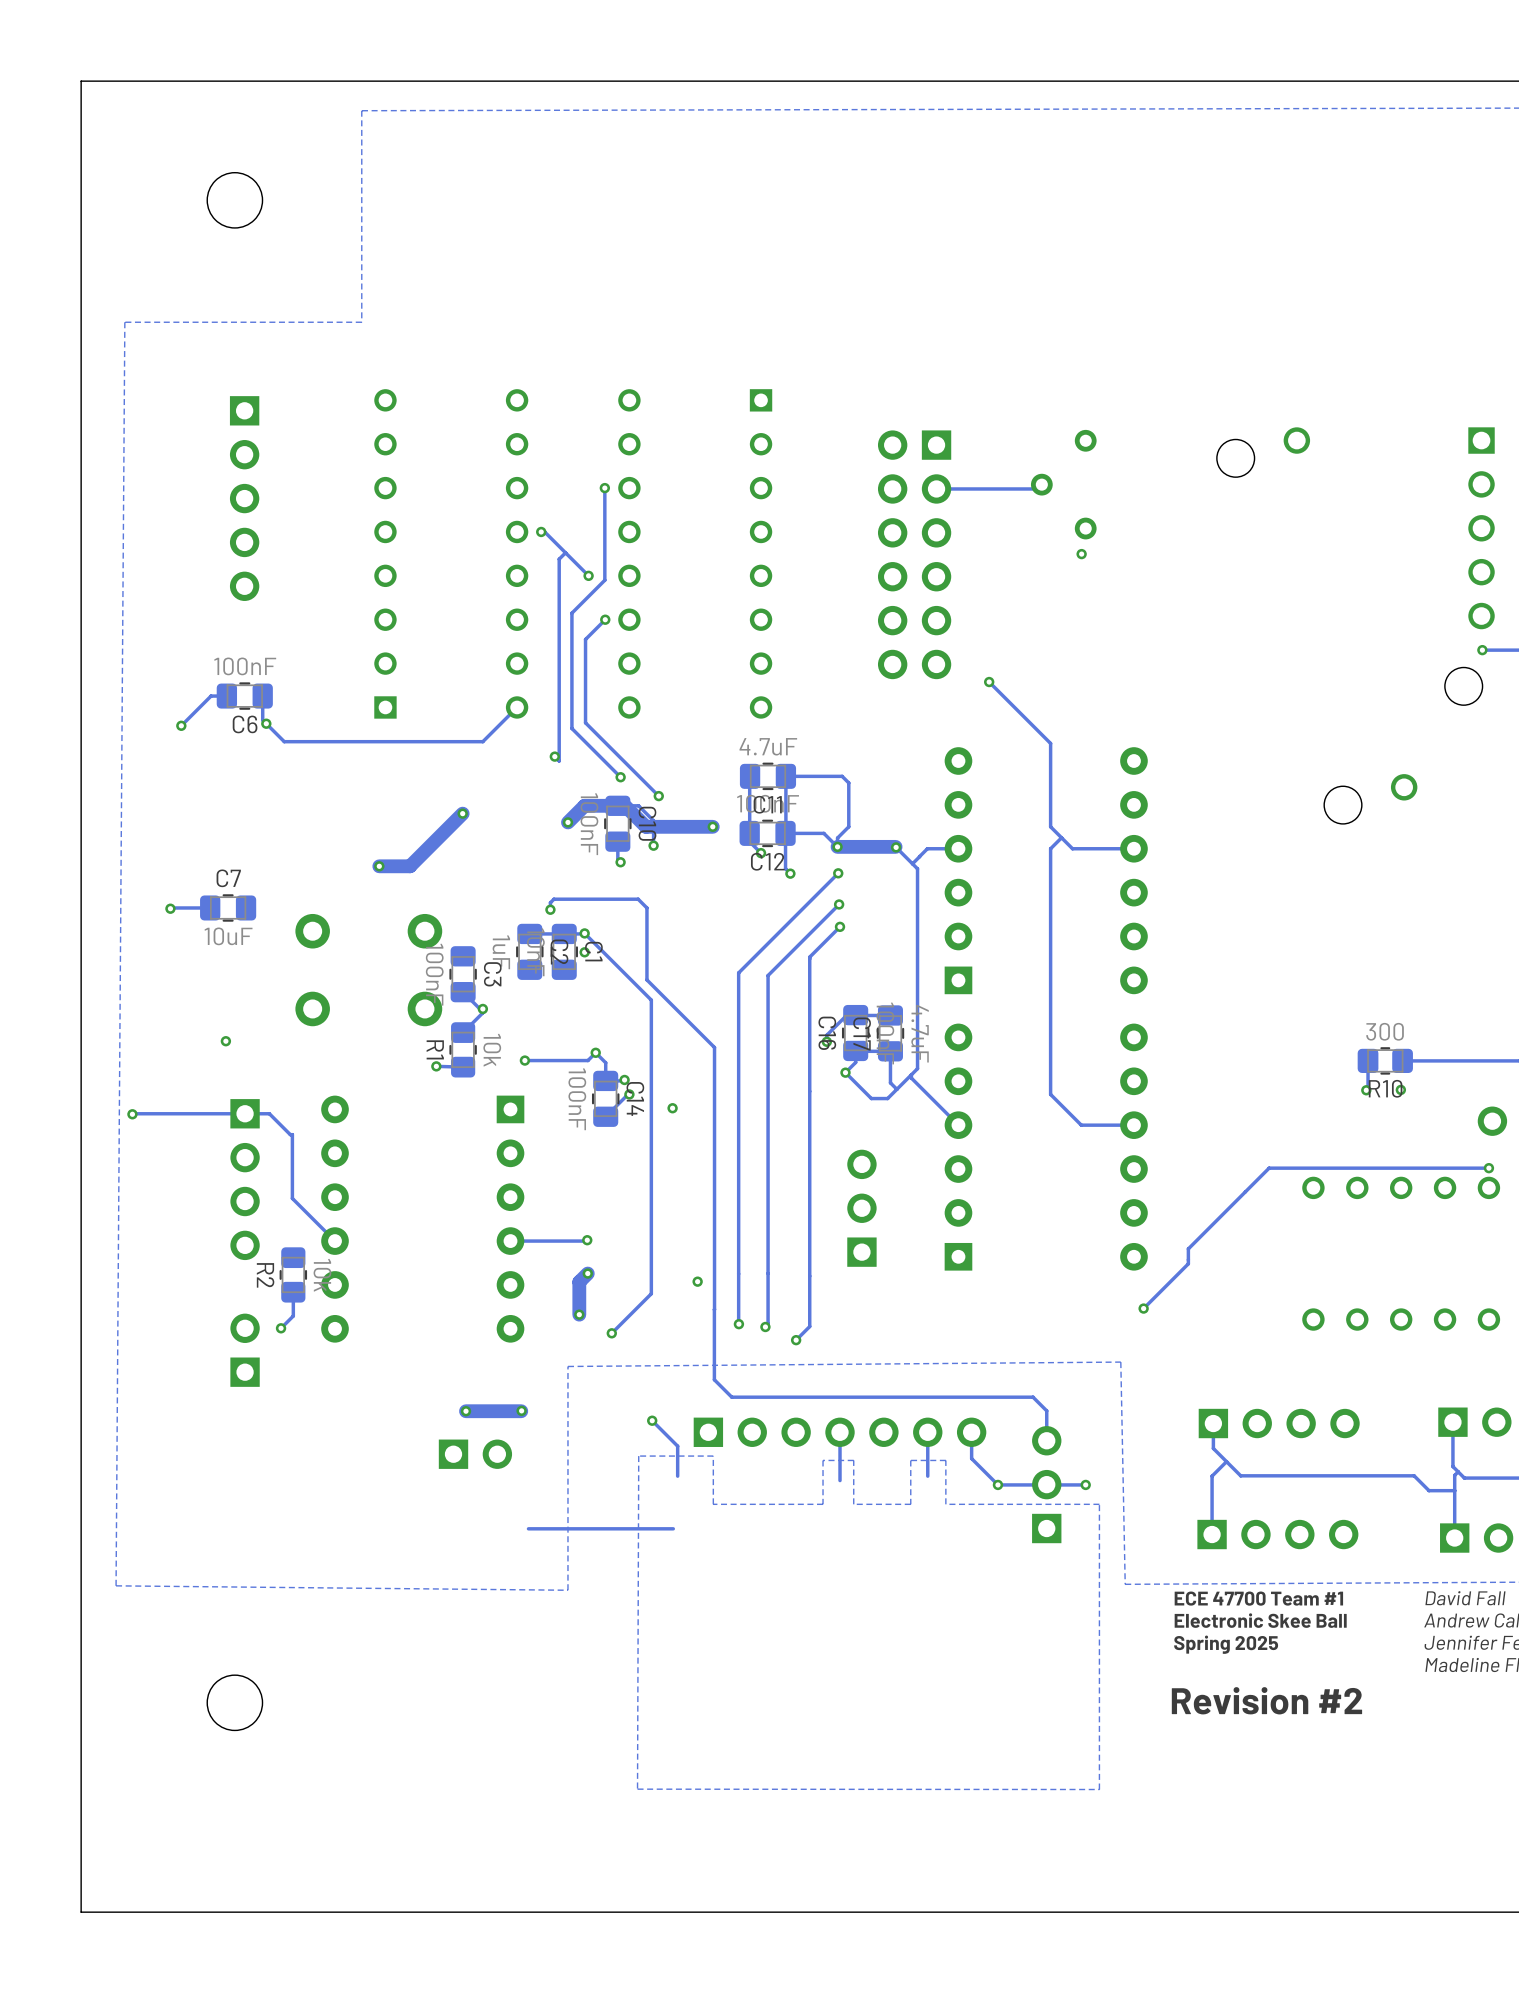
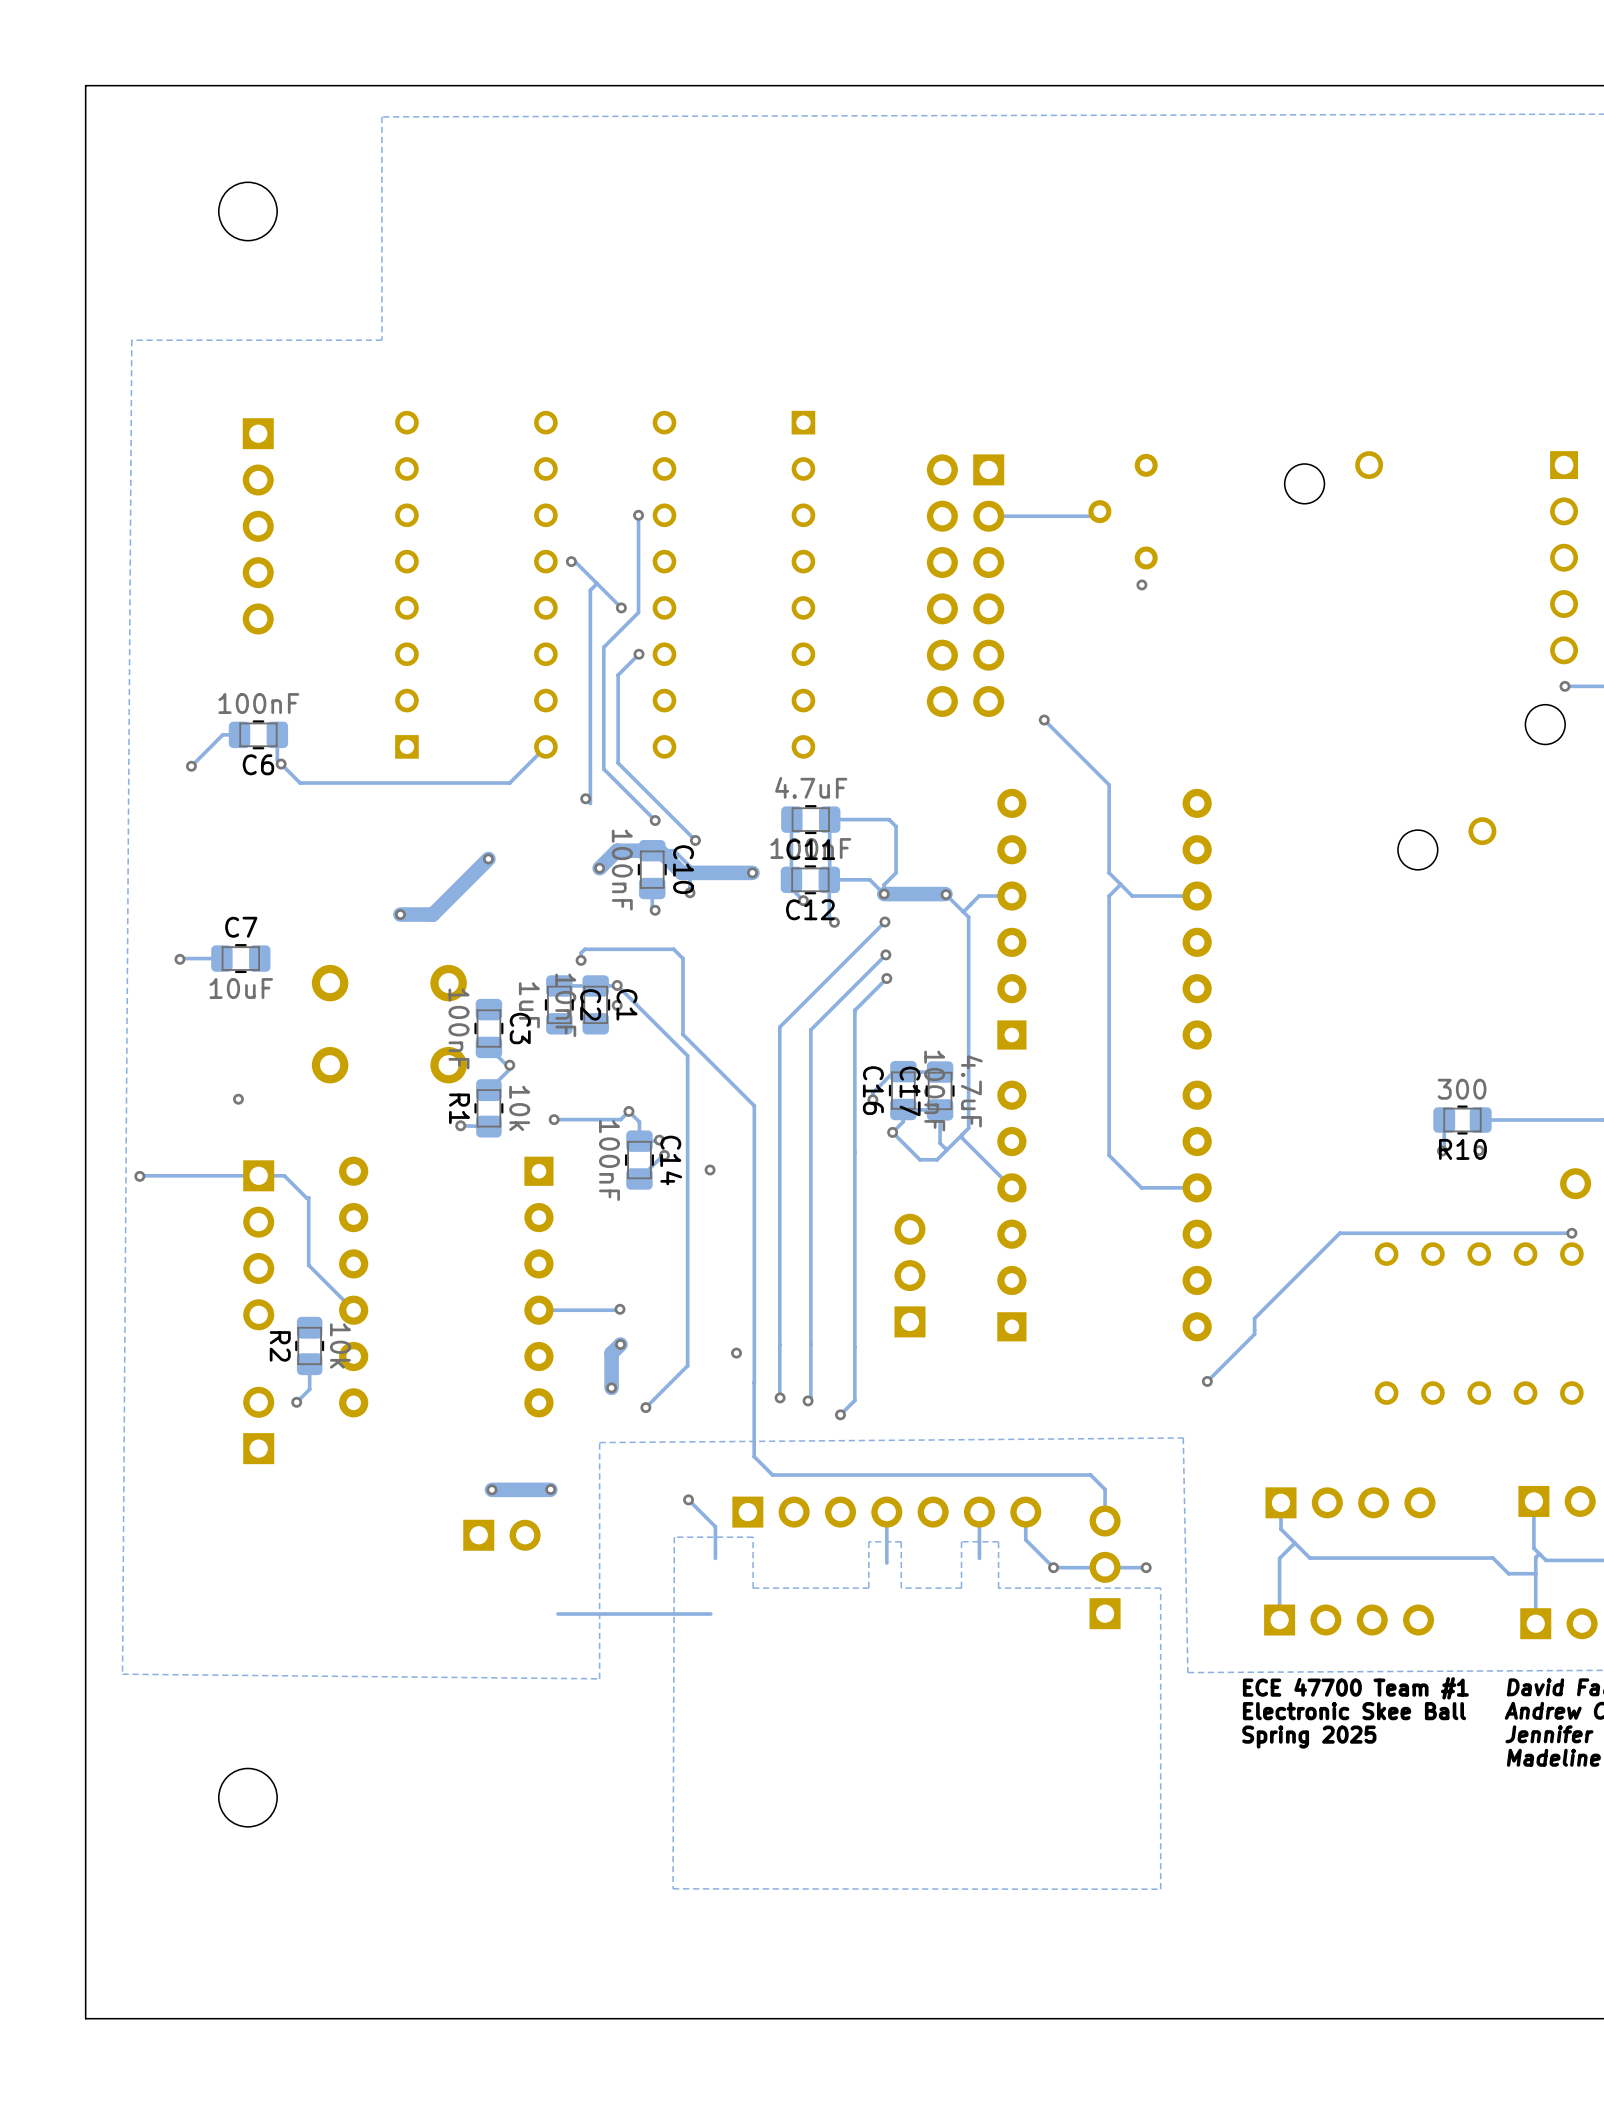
text: Revision #2 (1266, 1700) -> none

